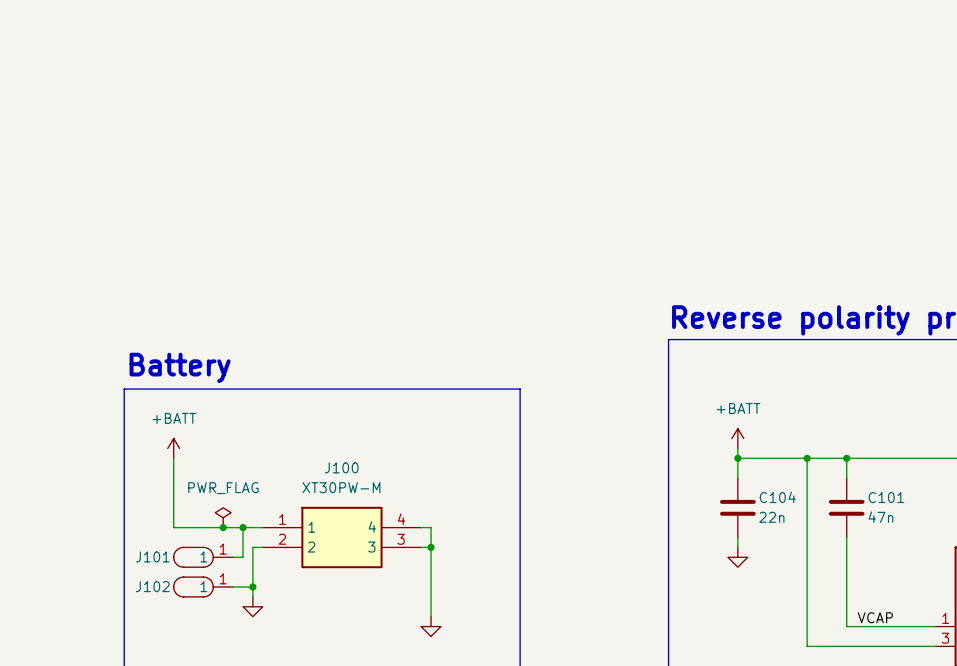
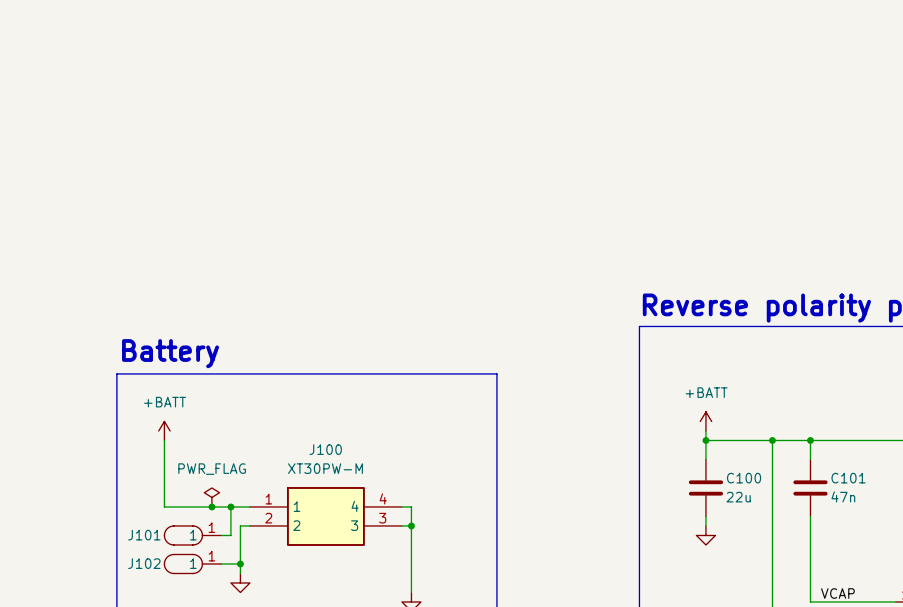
C104 name: C104 (777, 497) -> C100 (744, 478)
C104 value: 22n (771, 517) -> 22u (738, 497)

